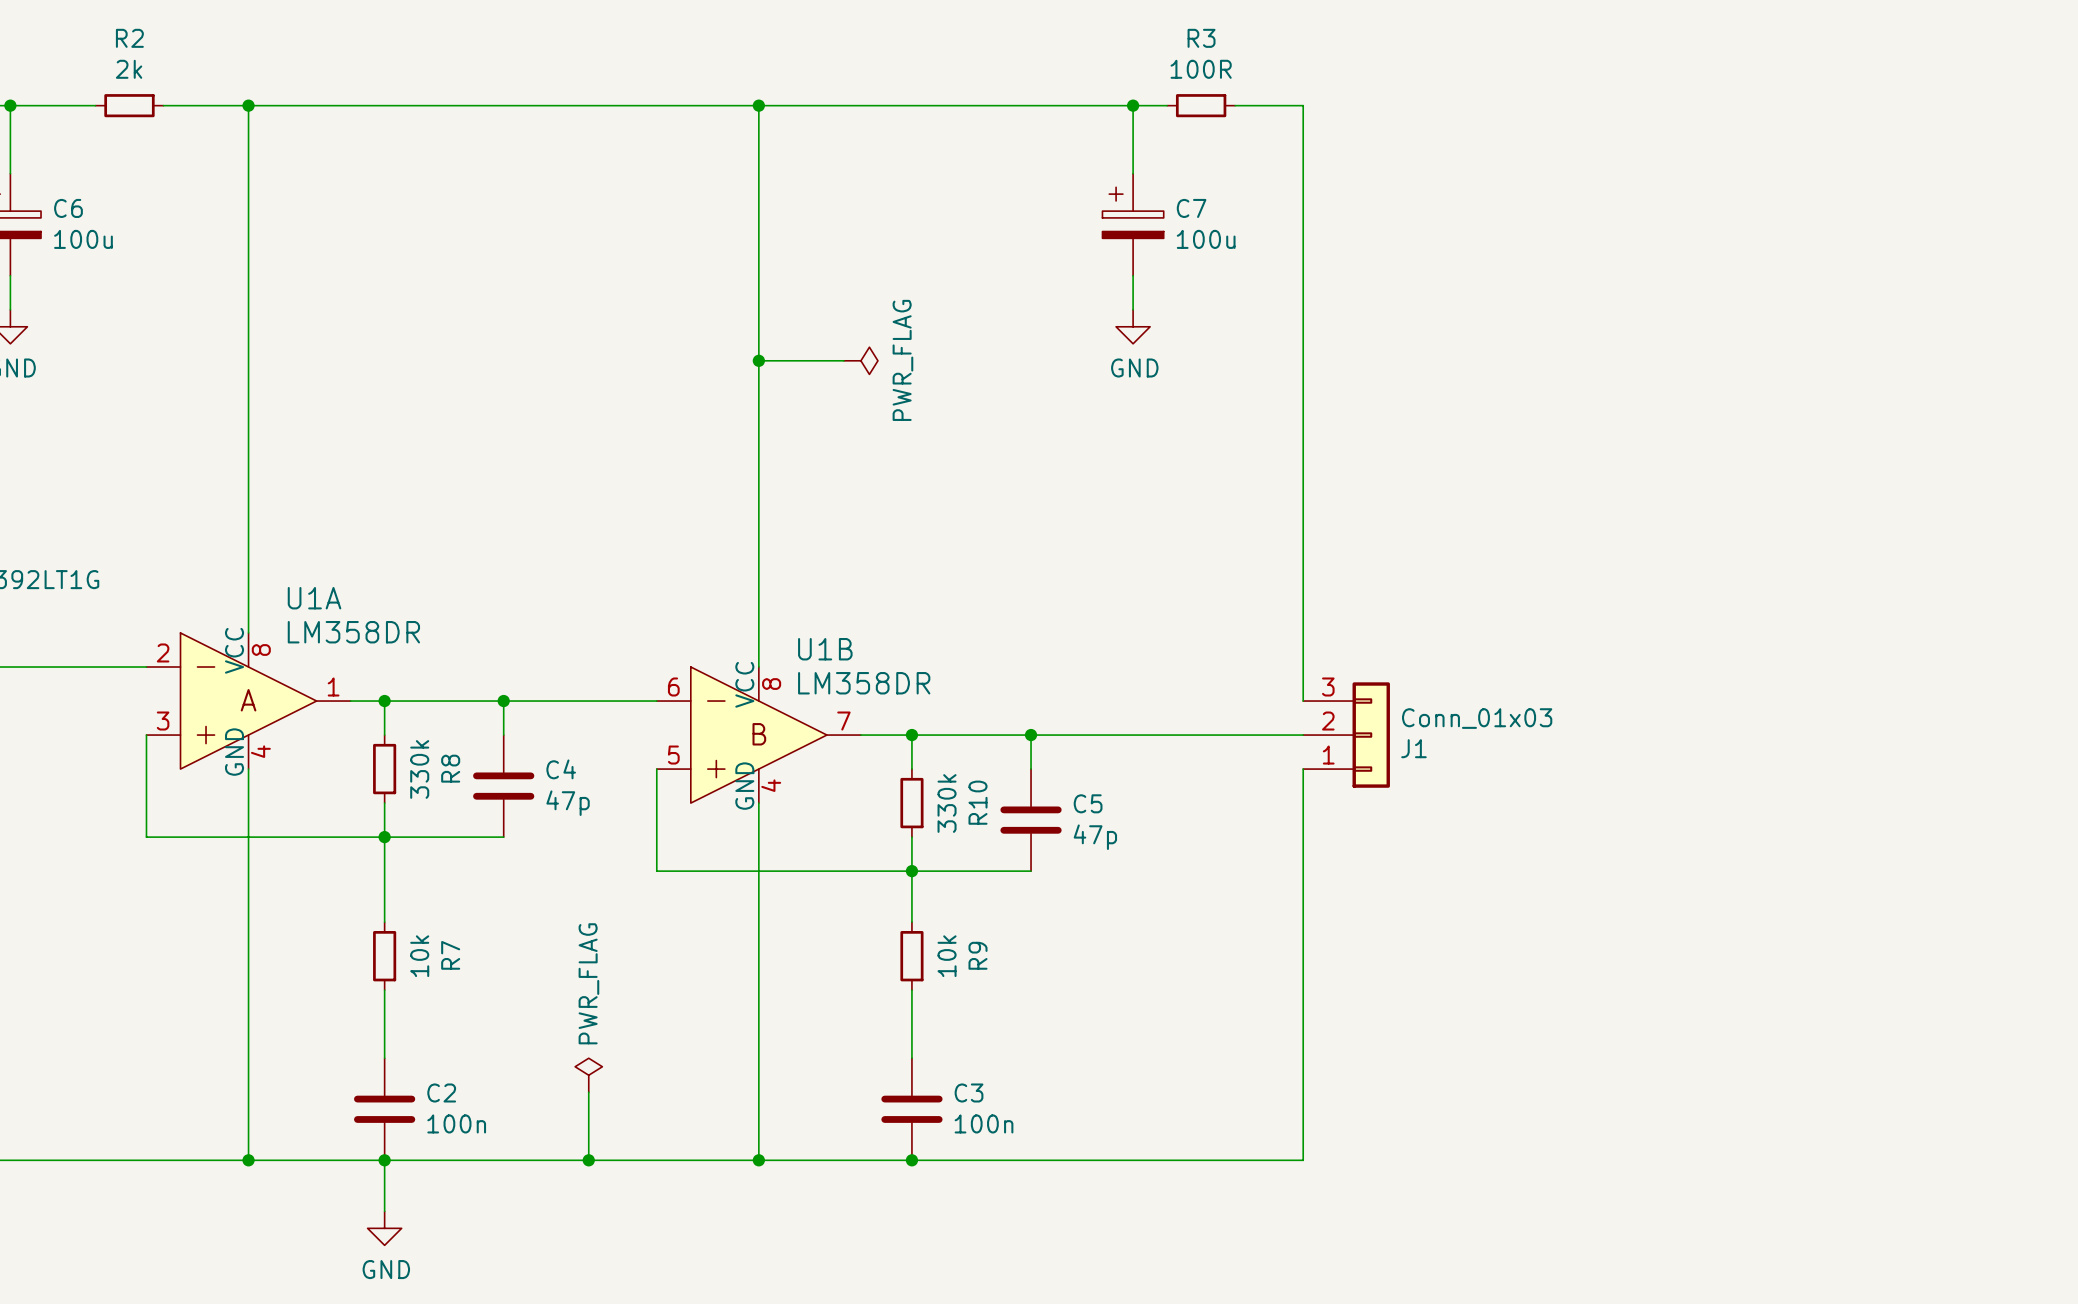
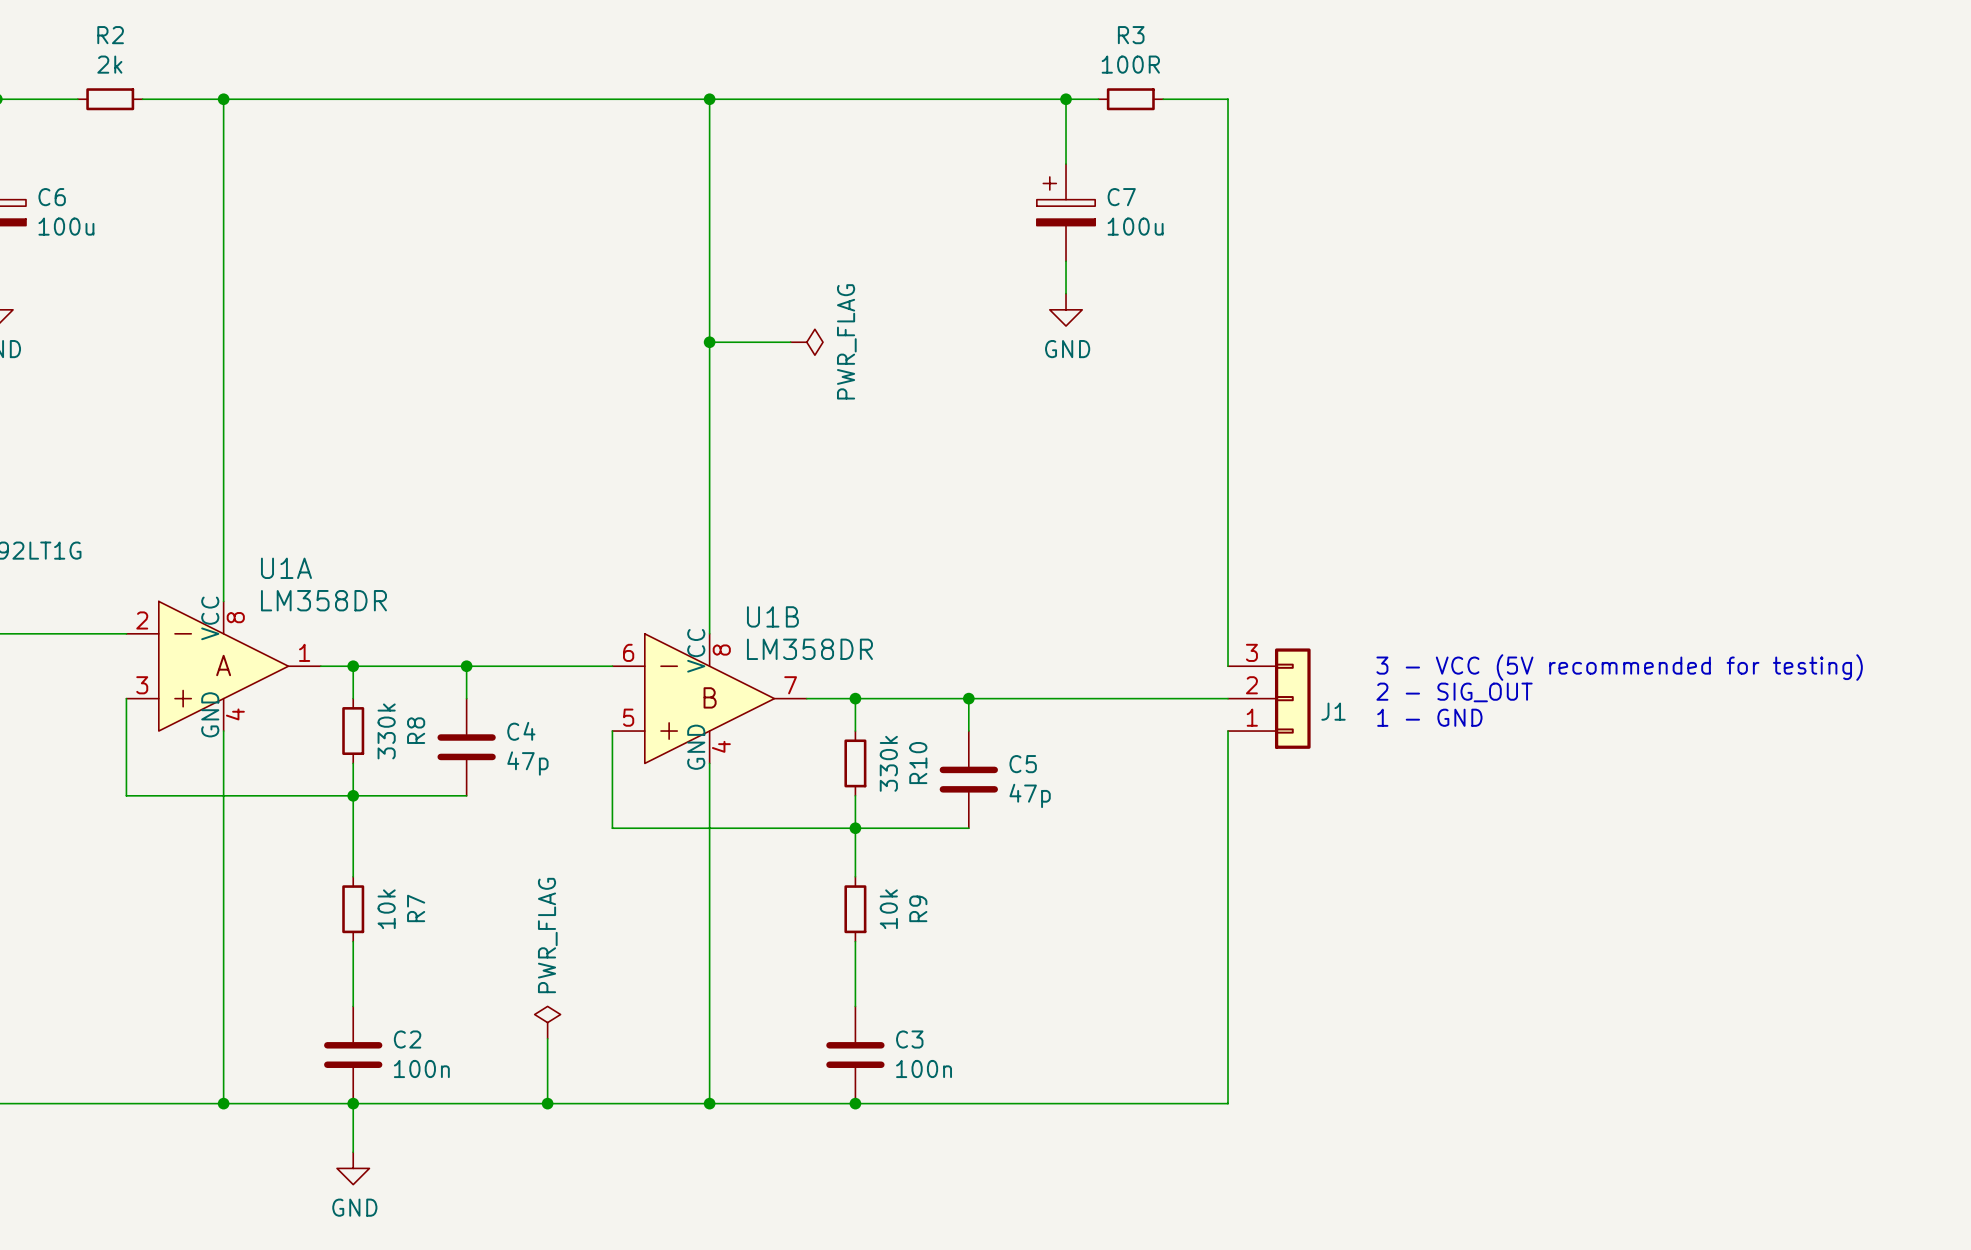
text: none -> 3 - VCC (5V recommended for testing) (1619, 667)
J1 value: Conn_01x03 (1477, 718) -> none
text: none -> 2 - SIG_OUT (1454, 692)
text: none -> 1 - GND (1429, 717)

